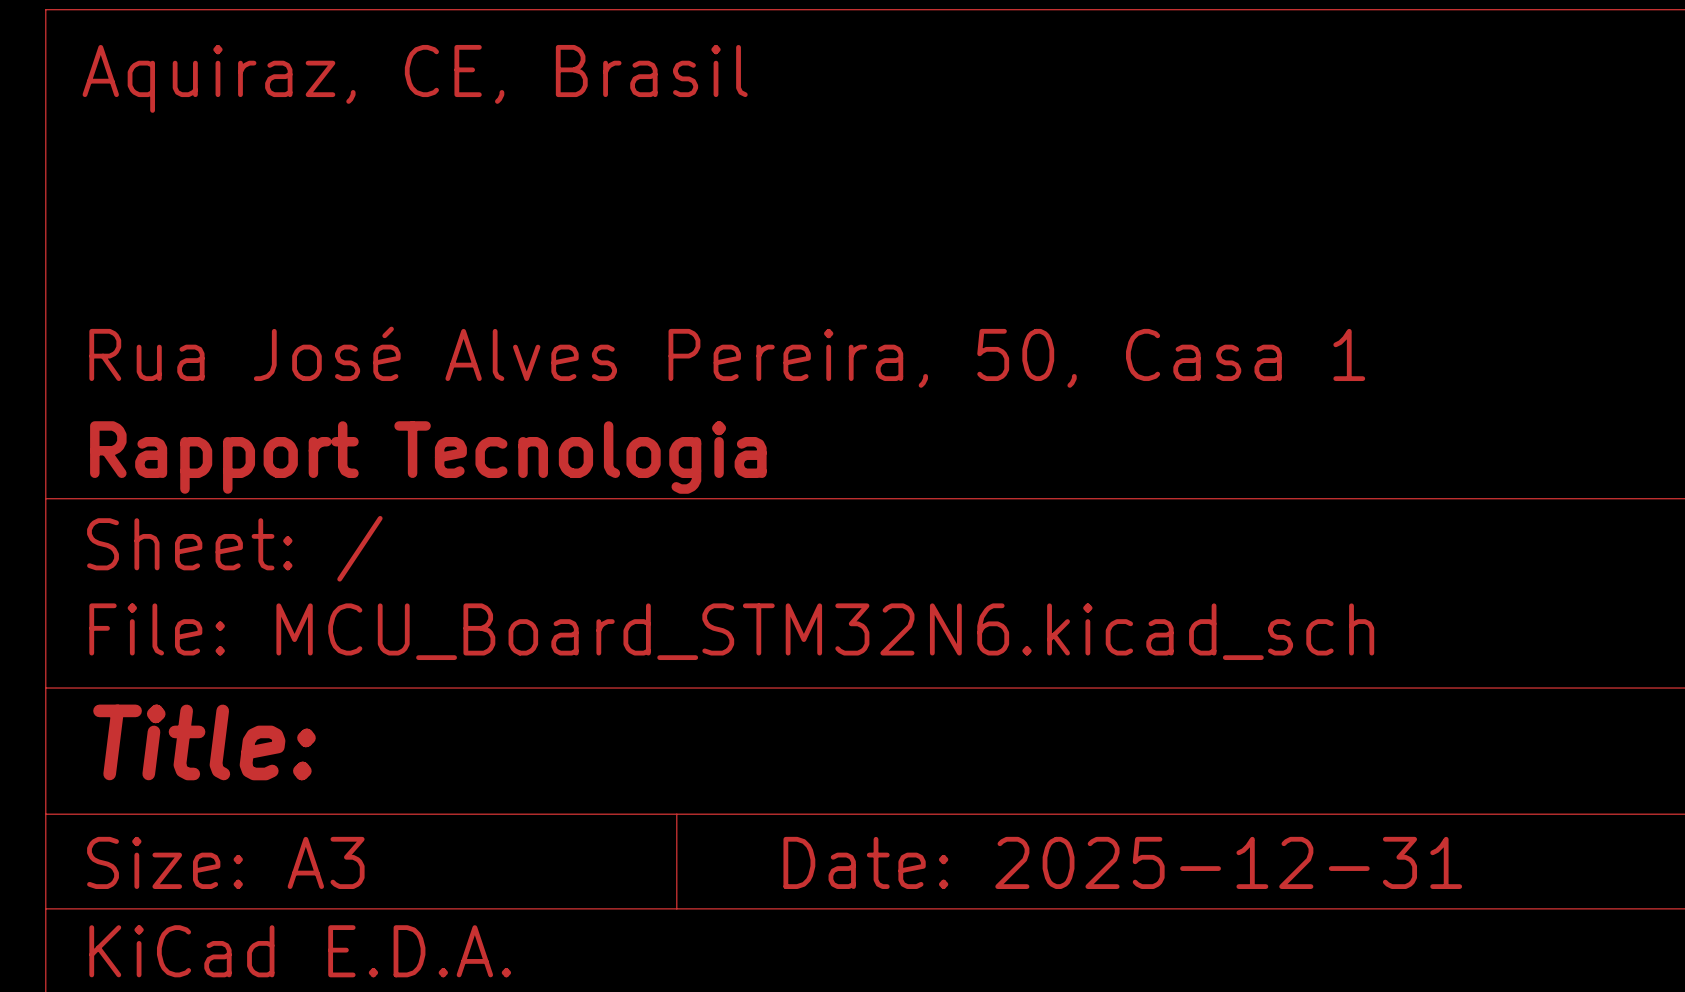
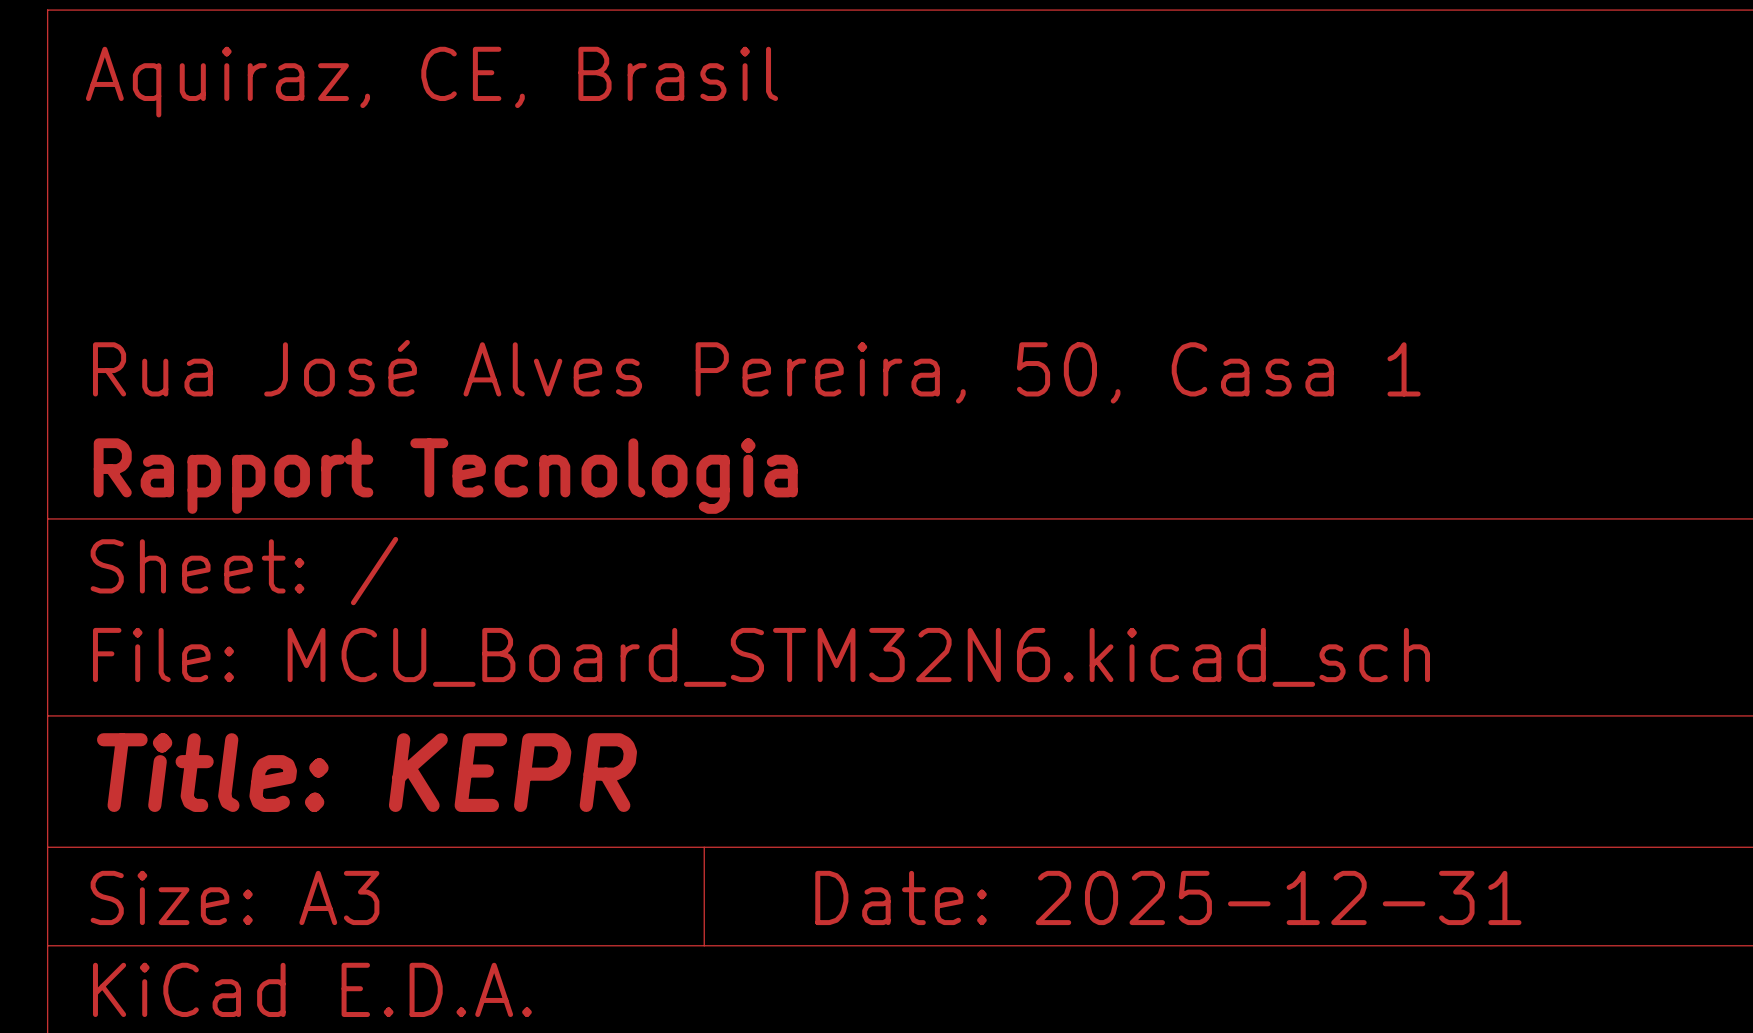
title block: Title: (204, 742) -> Title: KEPR (366, 772)

